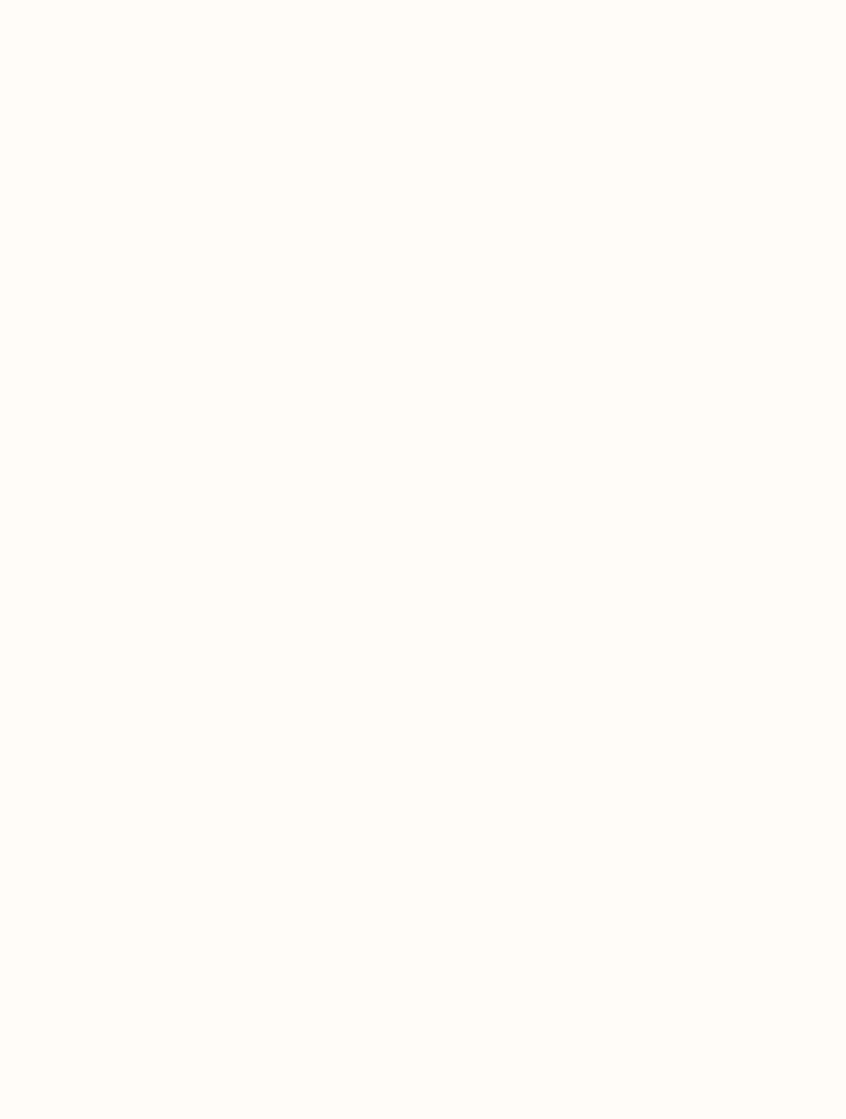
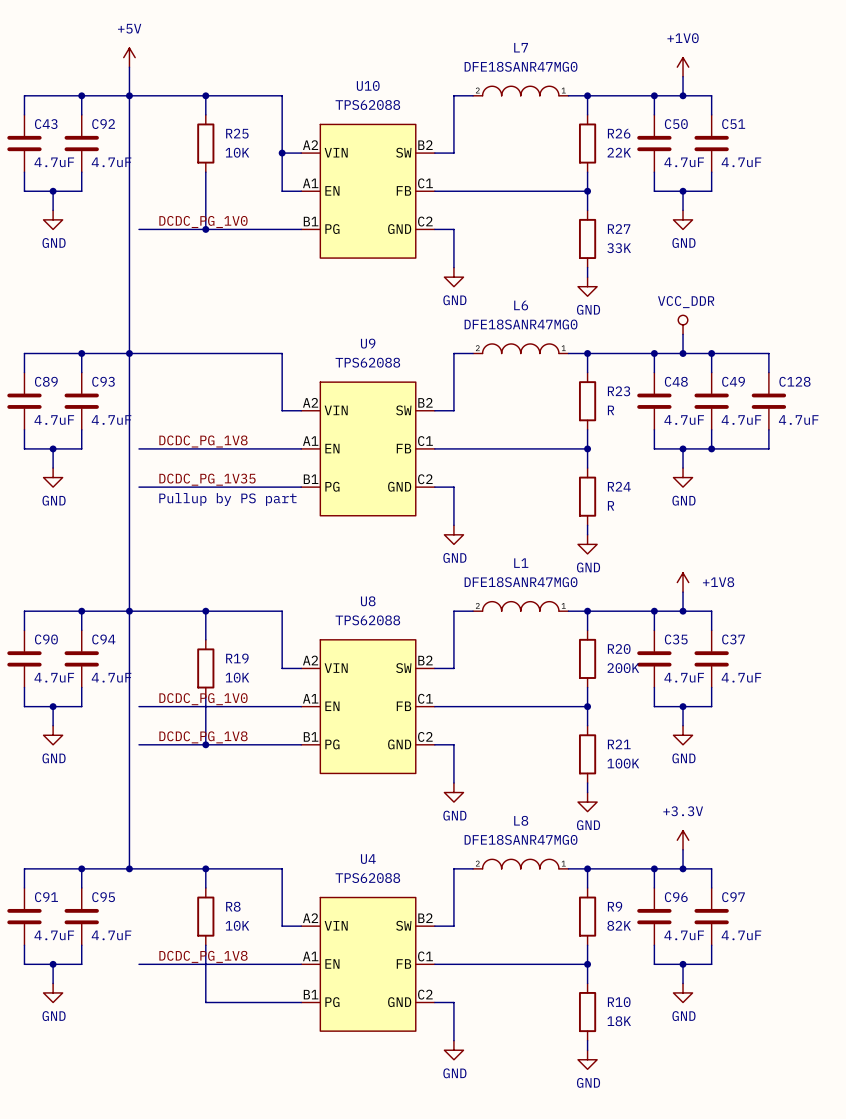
power symbol: none -> +5V (129, 57)
wire: none -> (129, 67) (129, 868)
power symbol: none -> +1V0 (683, 67)
wire: none -> (683, 76) (683, 95)
L7: none -> DFE18SANR47MG0 (520, 91)
wire: none -> (81, 95) (81, 114)
junction: none -> (81, 95)
junction: none -> (129, 95)
wire: none -> (205, 95) (205, 114)
junction: none -> (205, 95)
wire: none -> (473, 95) (453, 95) (453, 153) (434, 153)
wire: none -> (568, 95) (711, 95) (711, 114)
wire: none -> (587, 95) (587, 114)
junction: none -> (587, 95)
wire: none -> (654, 95) (654, 114)
junction: none -> (654, 95)
junction: none -> (683, 95)
wire: none -> (24, 114) (24, 95) (282, 95) (282, 191) (301, 191)
C43: none -> 4.7uF (24, 143)
C92: none -> 4.7uF (81, 143)
R25: none -> 10K (205, 143)
R26: none -> 22K (587, 143)
C50: none -> 4.7uF (654, 143)
C51: none -> 4.7uF (711, 143)
wire: none -> (282, 153) (301, 153)
junction: none -> (282, 153)
wire: none -> (24, 172) (24, 191) (81, 191) (81, 172)
wire: none -> (205, 172) (205, 229)
wire: none -> (587, 172) (587, 210)
wire: none -> (654, 172) (654, 191) (711, 191) (711, 172)
wire: none -> (53, 191) (53, 210)
junction: none -> (53, 191)
U10: none -> TPS62088 (368, 191)
wire: none -> (434, 191) (587, 191)
junction: none -> (587, 191)
wire: none -> (683, 191) (683, 210)
junction: none -> (683, 191)
power symbol: none -> GND (53, 219)
power symbol: none -> GND (683, 219)
label: none -> DCDC_PG_1V0 (203, 221)
wire: none -> (138, 229) (301, 229)
junction: none -> (205, 229)
wire: none -> (434, 229) (453, 229) (453, 267)
R27: none -> 33K (587, 238)
wire: none -> (587, 267) (587, 277)
power symbol: none -> GND (453, 277)
power symbol: none -> GND (587, 286)
power symbol: none -> VCC_DDR (683, 324)
wire: none -> (683, 334) (683, 353)
L6: none -> DFE18SANR47MG0 (520, 348)
wire: none -> (81, 353) (81, 372)
junction: none -> (81, 353)
junction: none -> (129, 353)
wire: none -> (473, 353) (453, 353) (453, 410) (434, 410)
wire: none -> (568, 353) (768, 353) (768, 372)
wire: none -> (587, 353) (587, 372)
junction: none -> (587, 353)
wire: none -> (654, 353) (654, 372)
junction: none -> (654, 353)
junction: none -> (683, 353)
wire: none -> (711, 353) (711, 372)
junction: none -> (711, 353)
wire: none -> (24, 372) (24, 353) (282, 353) (282, 410) (301, 410)
C89: none -> 4.7uF (24, 401)
C93: none -> 4.7uF (81, 401)
R23: none -> R (587, 401)
C48: none -> 4.7uF (654, 401)
C49: none -> 4.7uF (711, 401)
C128: none -> 4.7uF (768, 401)
wire: none -> (24, 429) (24, 448) (81, 448) (81, 429)
wire: none -> (587, 429) (587, 468)
wire: none -> (654, 429) (654, 448) (768, 448) (768, 429)
wire: none -> (711, 429) (711, 448)
label: none -> DCDC_PG_1V8 (203, 441)
wire: none -> (53, 448) (53, 468)
junction: none -> (53, 448)
wire: none -> (138, 448) (301, 448)
U9: none -> TPS62088 (368, 448)
wire: none -> (434, 448) (587, 448)
junction: none -> (587, 448)
wire: none -> (683, 448) (683, 468)
junction: none -> (683, 448)
junction: none -> (711, 448)
power symbol: none -> GND (53, 477)
power symbol: none -> GND (683, 477)
label: none -> DCDC_PG_1V35 (207, 479)
wire: none -> (138, 487) (301, 487)
wire: none -> (434, 487) (453, 487) (453, 525)
R24: none -> R (587, 496)
text: none -> Pullup by PS part (227, 499)
wire: none -> (587, 525) (587, 534)
power symbol: none -> GND (453, 534)
power symbol: none -> GND (587, 544)
power symbol: none -> +1V8 (683, 582)
wire: none -> (683, 592) (683, 611)
L1: none -> DFE18SANR47MG0 (520, 606)
wire: none -> (81, 611) (81, 630)
junction: none -> (81, 611)
junction: none -> (129, 611)
wire: none -> (205, 611) (205, 639)
junction: none -> (205, 611)
wire: none -> (473, 611) (453, 611) (453, 668) (434, 668)
wire: none -> (568, 611) (711, 611) (711, 630)
wire: none -> (587, 611) (587, 630)
junction: none -> (587, 611)
wire: none -> (654, 611) (654, 630)
junction: none -> (654, 611)
junction: none -> (683, 611)
wire: none -> (24, 630) (24, 611) (282, 611) (282, 668) (301, 668)
C90: none -> 4.7uF (24, 658)
C94: none -> 4.7uF (81, 658)
R20: none -> 200K (587, 658)
C35: none -> 4.7uF (654, 658)
C37: none -> 4.7uF (711, 658)
R19: none -> 10K (205, 668)
wire: none -> (24, 687) (24, 706) (81, 706) (81, 687)
wire: none -> (587, 687) (587, 725)
wire: none -> (654, 687) (654, 706) (711, 706) (711, 687)
wire: none -> (205, 697) (205, 744)
label: none -> DCDC_PG_1V0 (203, 699)
wire: none -> (53, 706) (53, 725)
junction: none -> (53, 706)
wire: none -> (138, 706) (301, 706)
U8: none -> TPS62088 (368, 706)
wire: none -> (434, 706) (587, 706)
junction: none -> (587, 706)
wire: none -> (683, 706) (683, 725)
junction: none -> (683, 706)
power symbol: none -> GND (53, 735)
power symbol: none -> GND (683, 735)
label: none -> DCDC_PG_1V8 (203, 737)
wire: none -> (138, 744) (301, 744)
junction: none -> (205, 744)
wire: none -> (434, 744) (453, 744) (453, 782)
R21: none -> 100K (587, 754)
wire: none -> (587, 782) (587, 792)
power symbol: none -> GND (453, 792)
power symbol: none -> GND (587, 802)
power symbol: none -> +3.3V (683, 840)
wire: none -> (683, 849) (683, 868)
L8: none -> DFE18SANR47MG0 (520, 864)
wire: none -> (81, 868) (81, 887)
junction: none -> (81, 868)
junction: none -> (129, 868)
wire: none -> (205, 868) (205, 887)
junction: none -> (205, 868)
wire: none -> (473, 868) (453, 868) (453, 926) (434, 926)
wire: none -> (568, 868) (711, 868) (711, 887)
wire: none -> (587, 868) (587, 887)
junction: none -> (587, 868)
wire: none -> (654, 868) (654, 887)
junction: none -> (654, 868)
junction: none -> (683, 868)
wire: none -> (24, 887) (24, 868) (282, 868) (282, 926) (301, 926)
C91: none -> 4.7uF (24, 916)
C95: none -> 4.7uF (81, 916)
R8: none -> 10K (205, 916)
R9: none -> 82K (587, 916)
C96: none -> 4.7uF (654, 916)
C97: none -> 4.7uF (711, 916)
wire: none -> (24, 945) (24, 964) (81, 964) (81, 945)
wire: none -> (205, 945) (205, 1002) (301, 1002)
wire: none -> (587, 945) (587, 983)
wire: none -> (654, 945) (654, 964) (711, 964) (711, 945)
label: none -> DCDC_PG_1V8 (203, 956)
wire: none -> (53, 964) (53, 983)
junction: none -> (53, 964)
wire: none -> (138, 964) (301, 964)
U4: none -> TPS62088 (368, 964)
wire: none -> (434, 964) (587, 964)
junction: none -> (587, 964)
wire: none -> (683, 964) (683, 983)
junction: none -> (683, 964)
power symbol: none -> GND (53, 992)
power symbol: none -> GND (683, 992)
wire: none -> (434, 1002) (453, 1002) (453, 1040)
R10: none -> 18K (587, 1012)
wire: none -> (587, 1040) (587, 1050)
power symbol: none -> GND (453, 1050)
power symbol: none -> GND (587, 1059)

